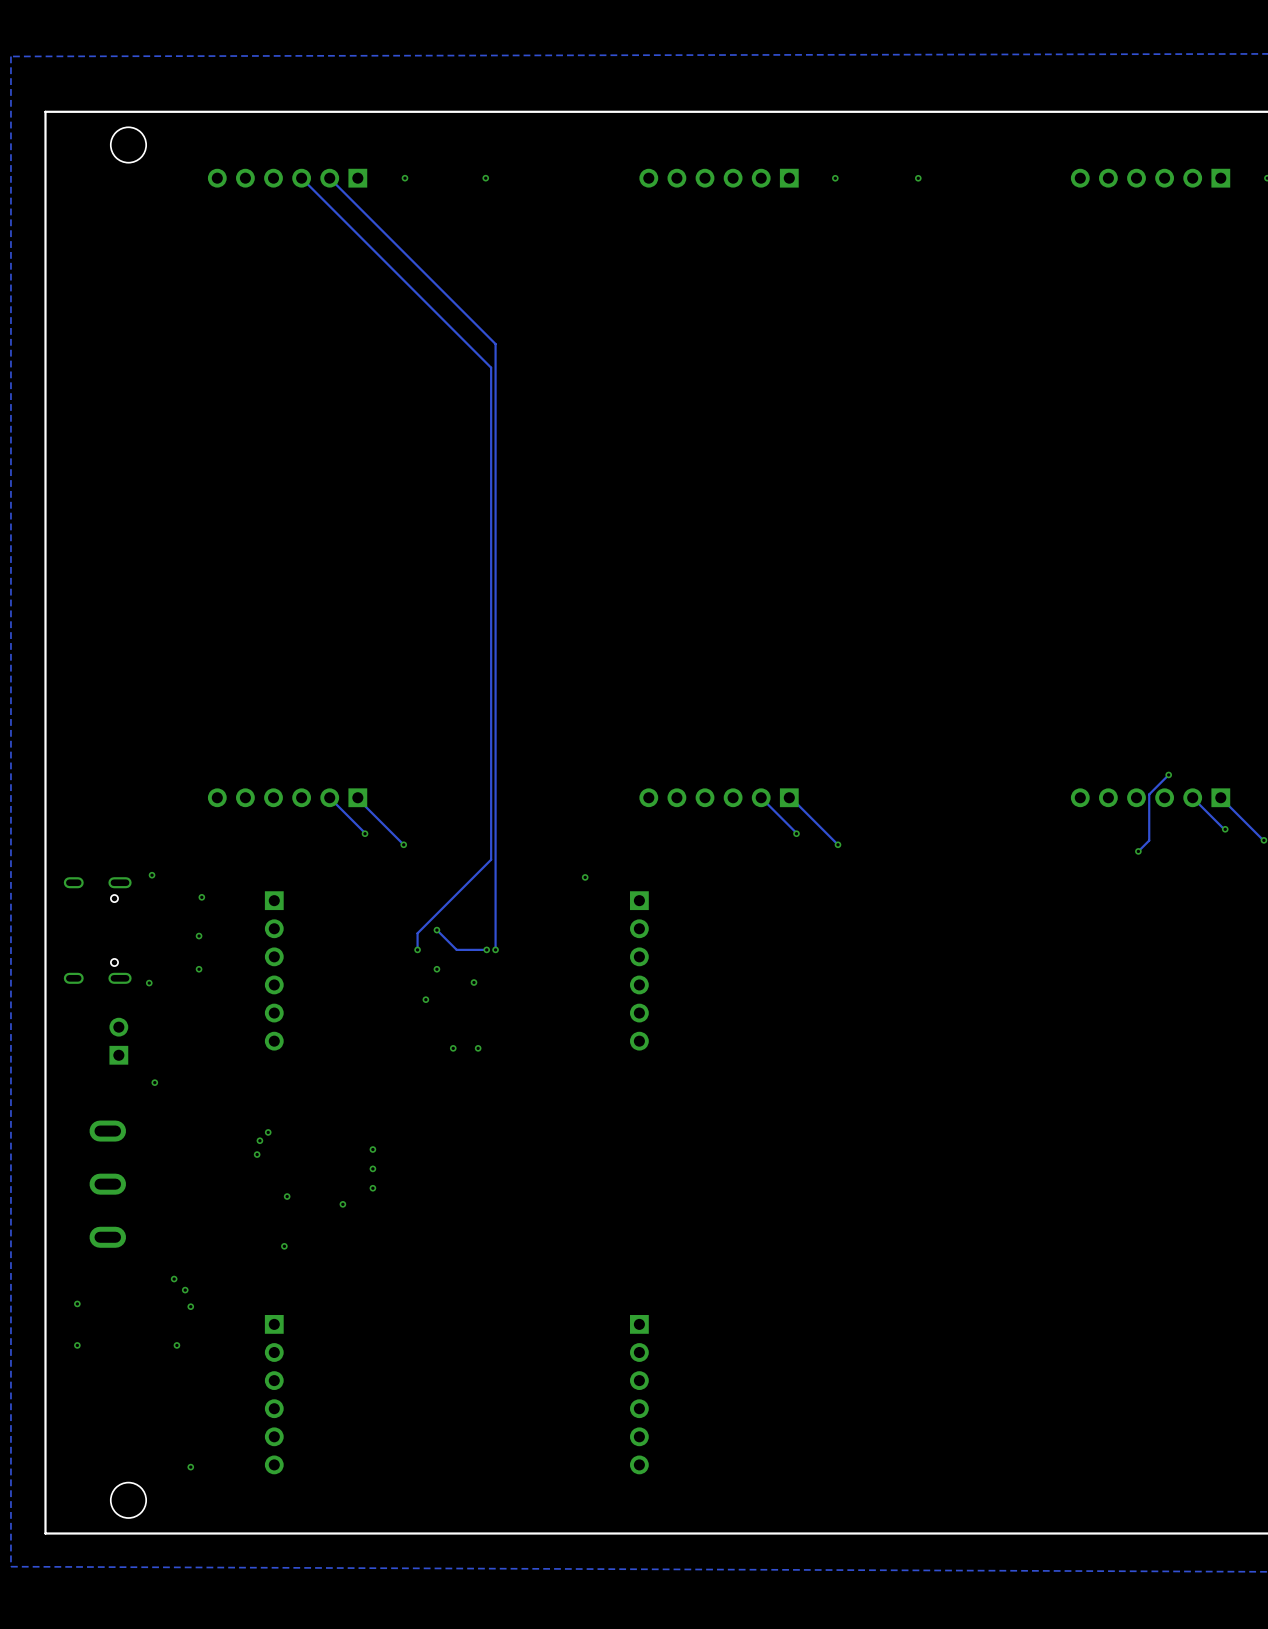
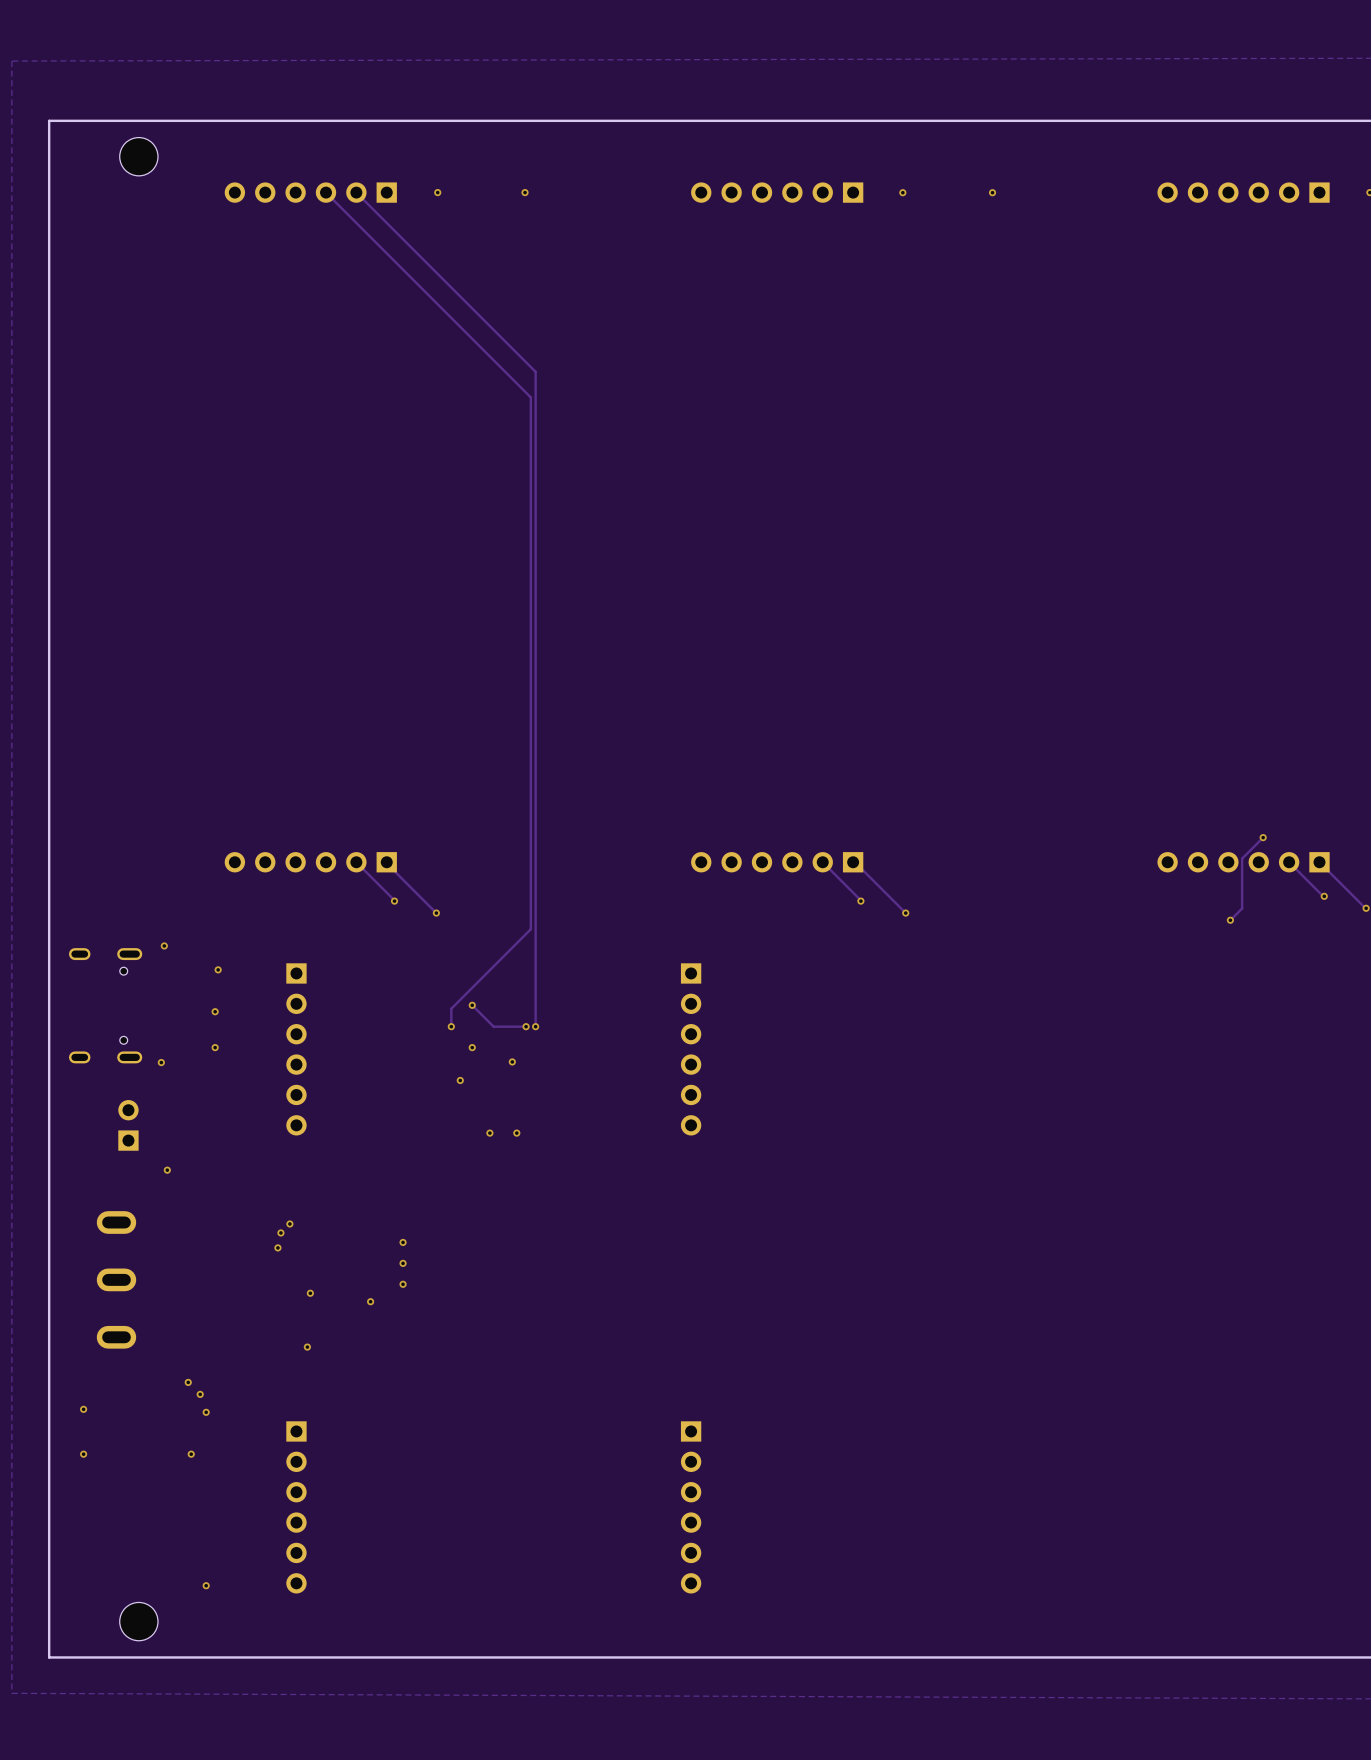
via: (585, 877) -> none

